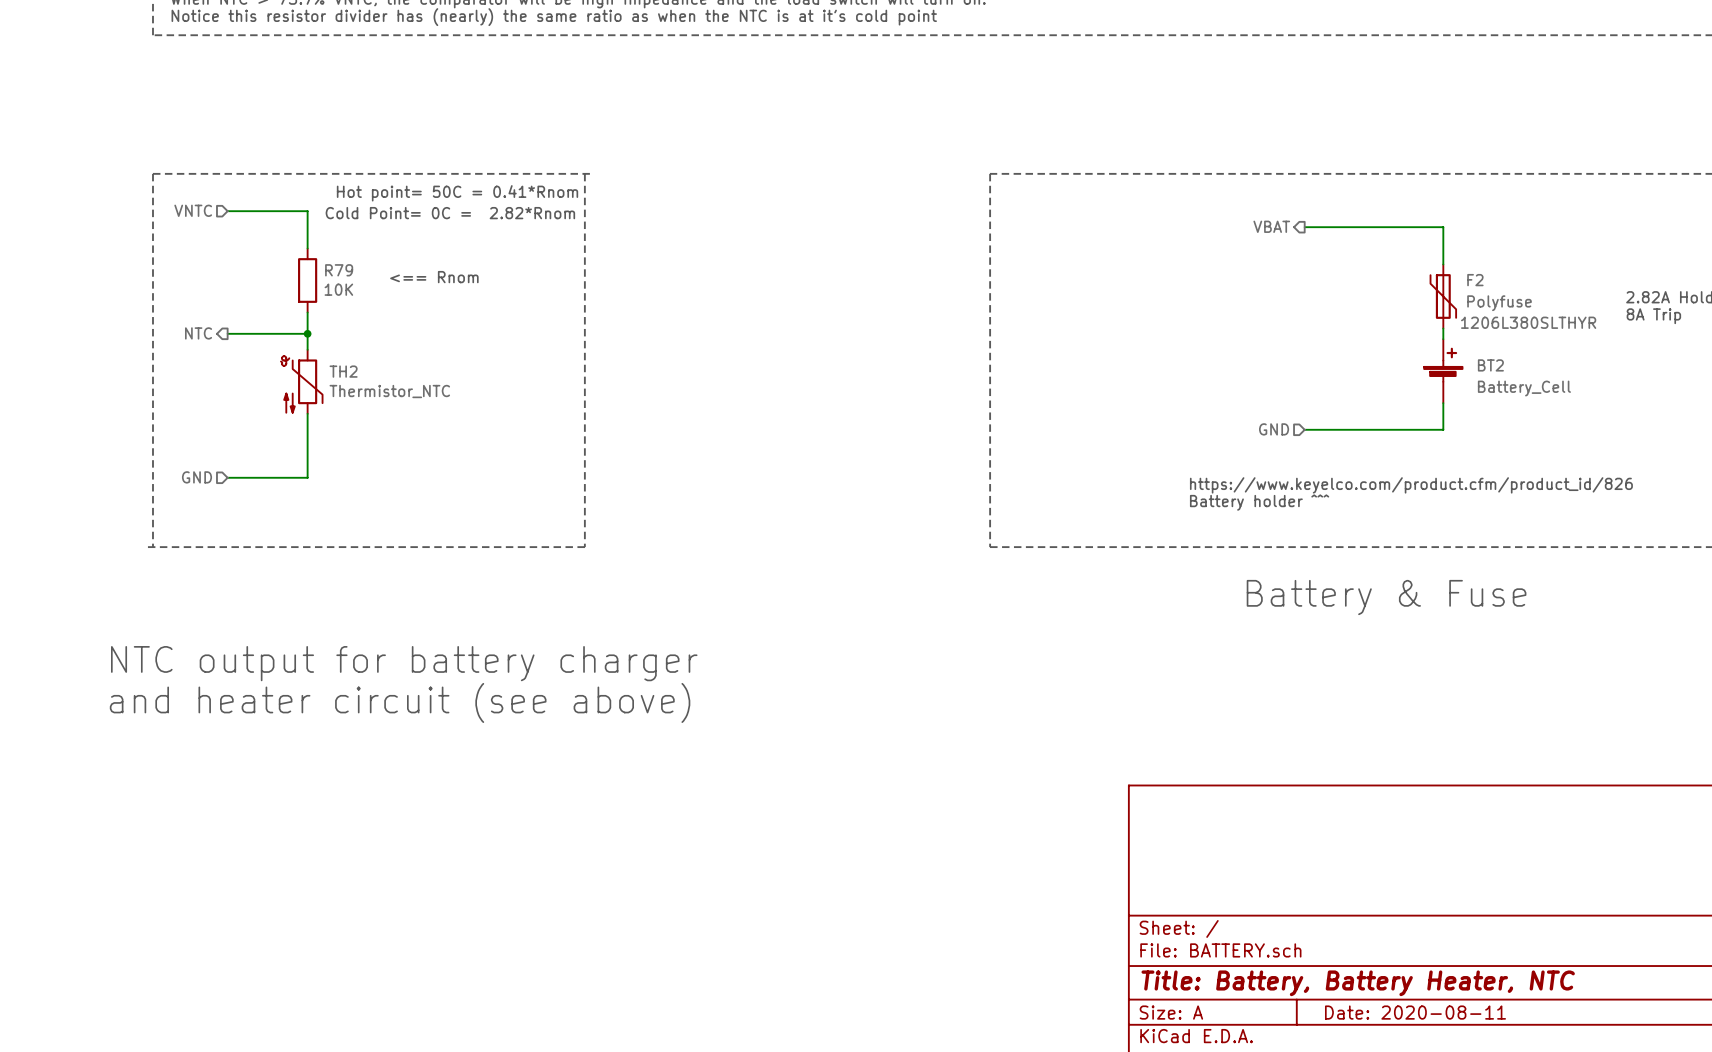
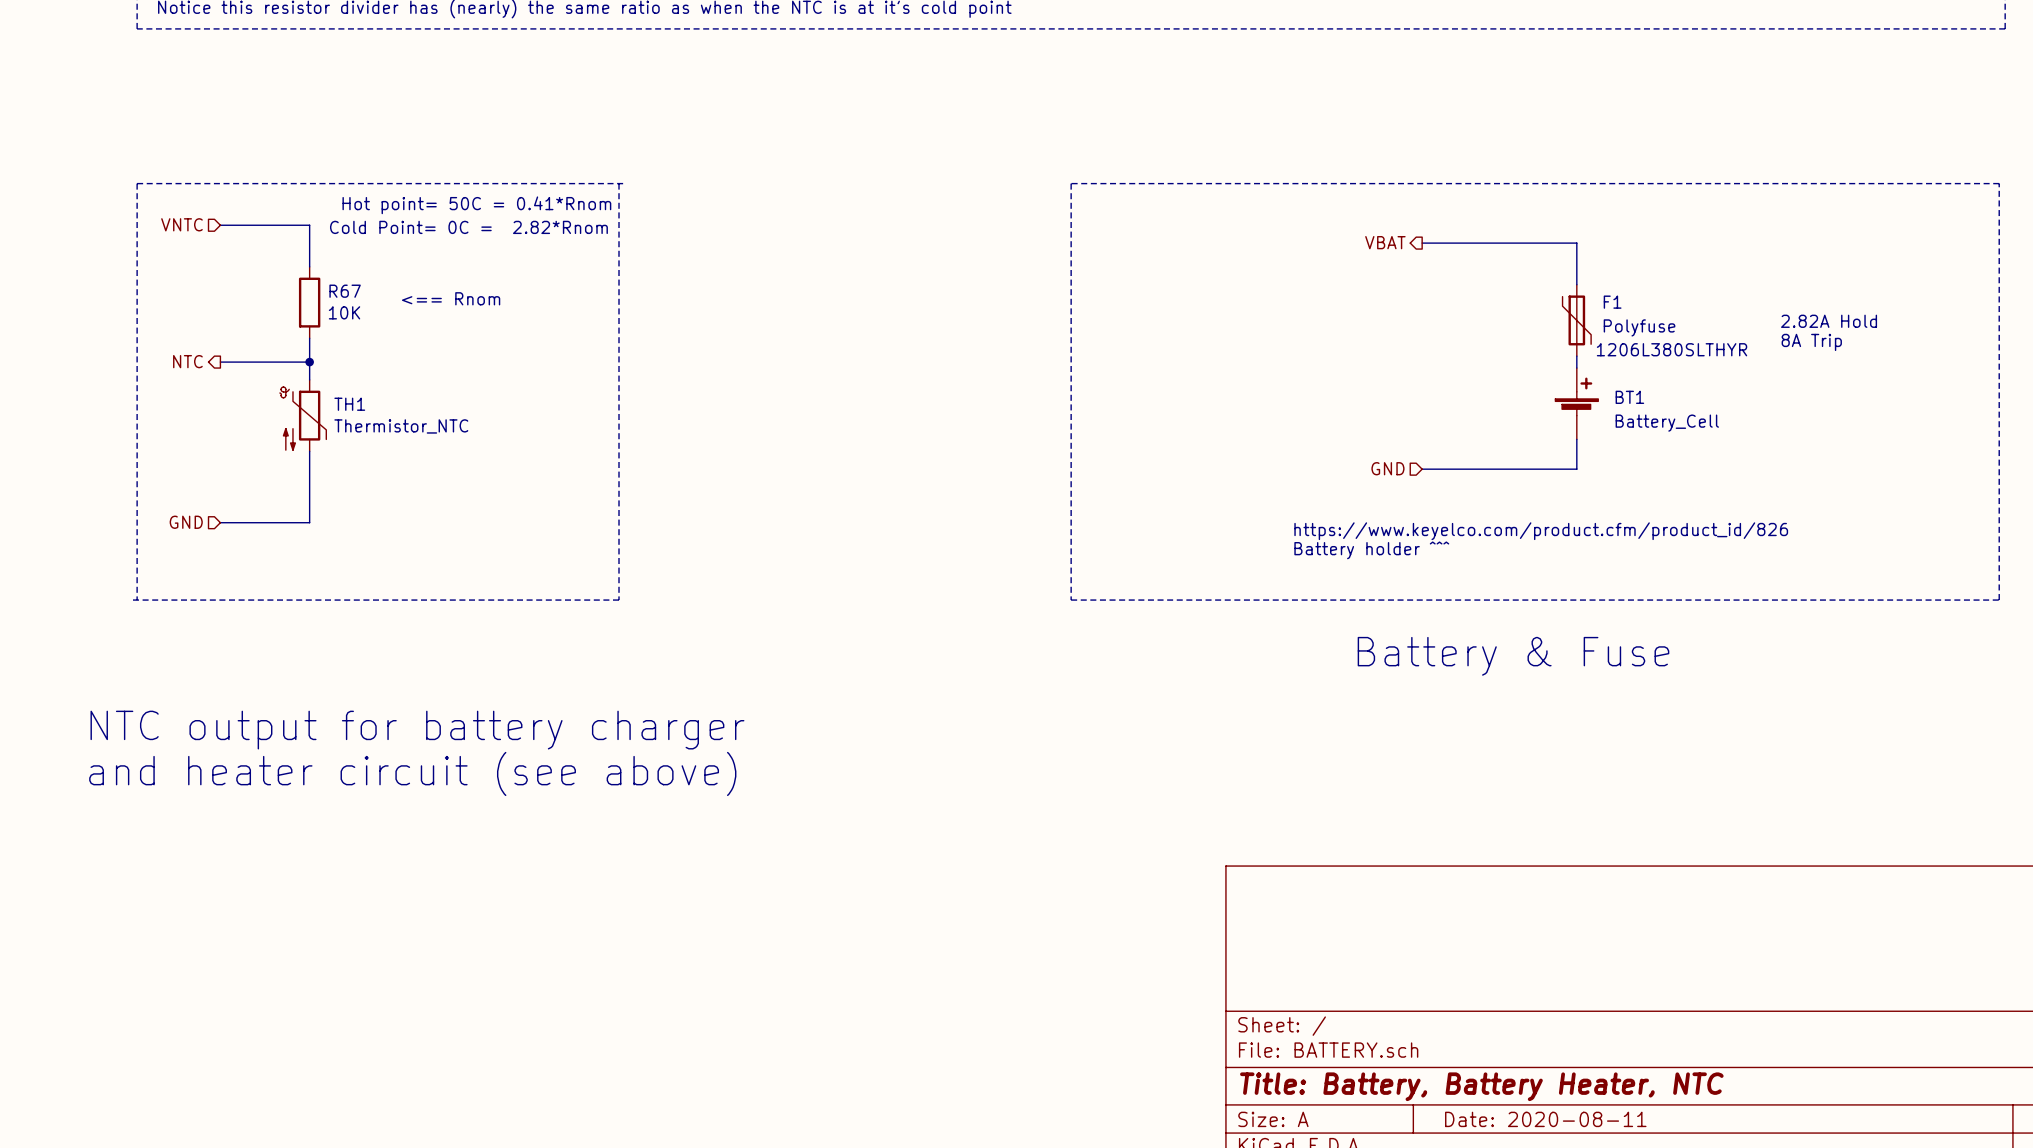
R79 name: R79 (339, 270) -> R67 (345, 291)
F2 name: F2 (1475, 280) -> F1 (1612, 302)
BT2 name: BT2 (1490, 365) -> BT1 (1629, 397)
TH2 name: TH2 (343, 371) -> TH1 (349, 404)

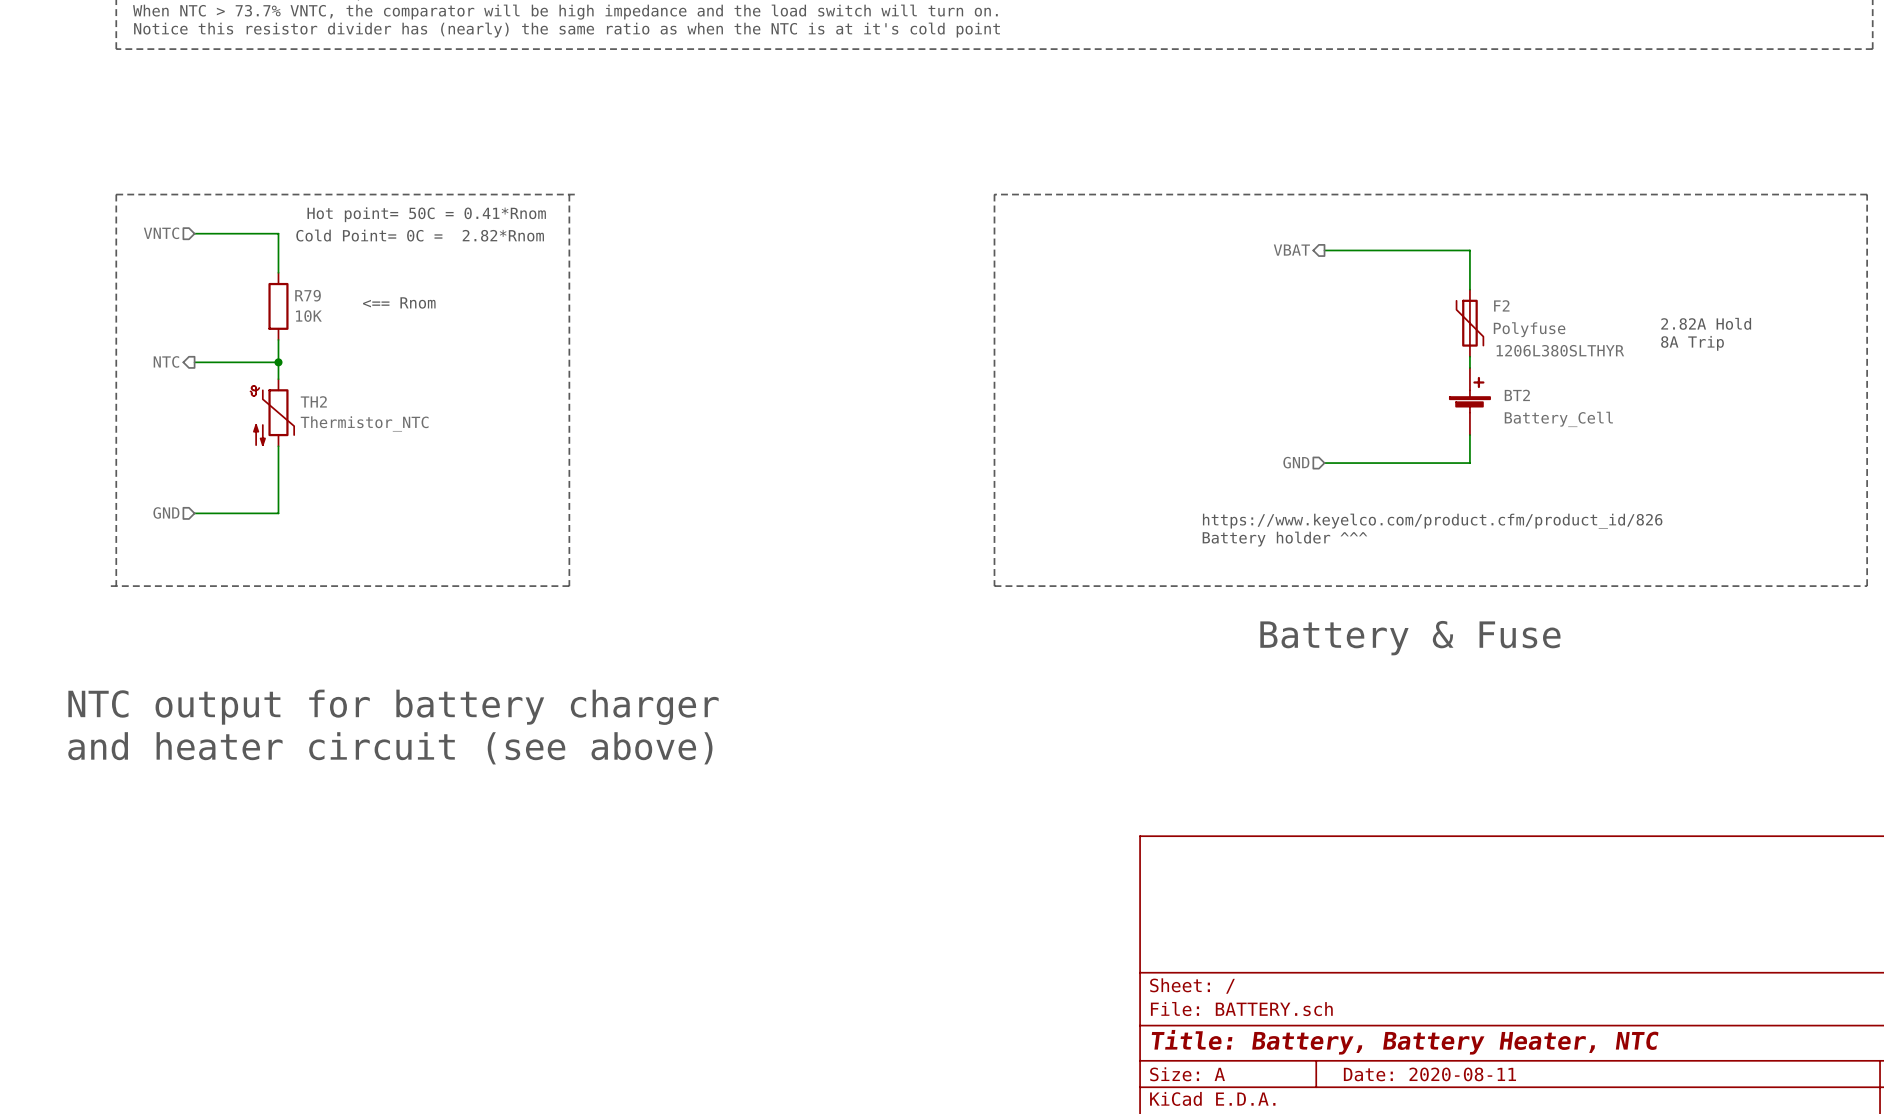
R67 name: R67 (345, 291) -> R79 (308, 295)
F1 name: F1 (1612, 302) -> F2 (1501, 305)
BT1 name: BT1 (1629, 397) -> BT2 (1517, 395)
TH1 name: TH1 (349, 404) -> TH2 (313, 401)

